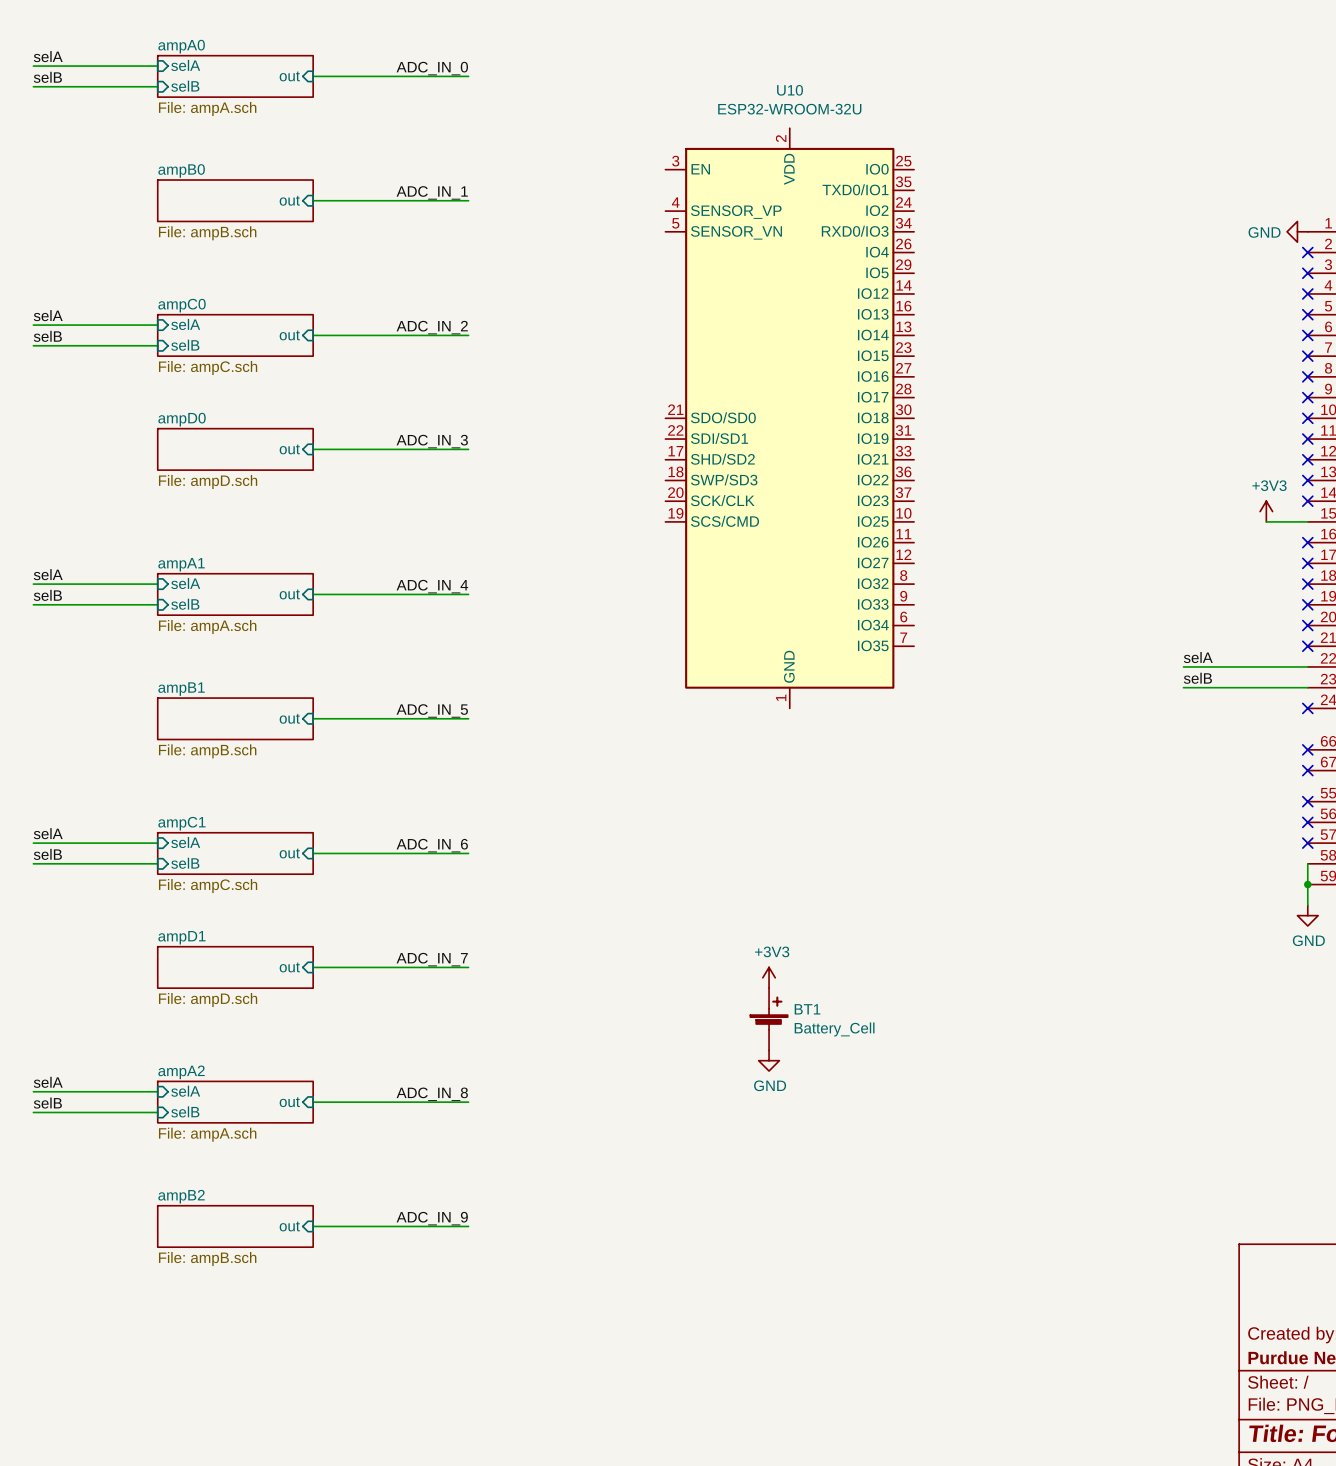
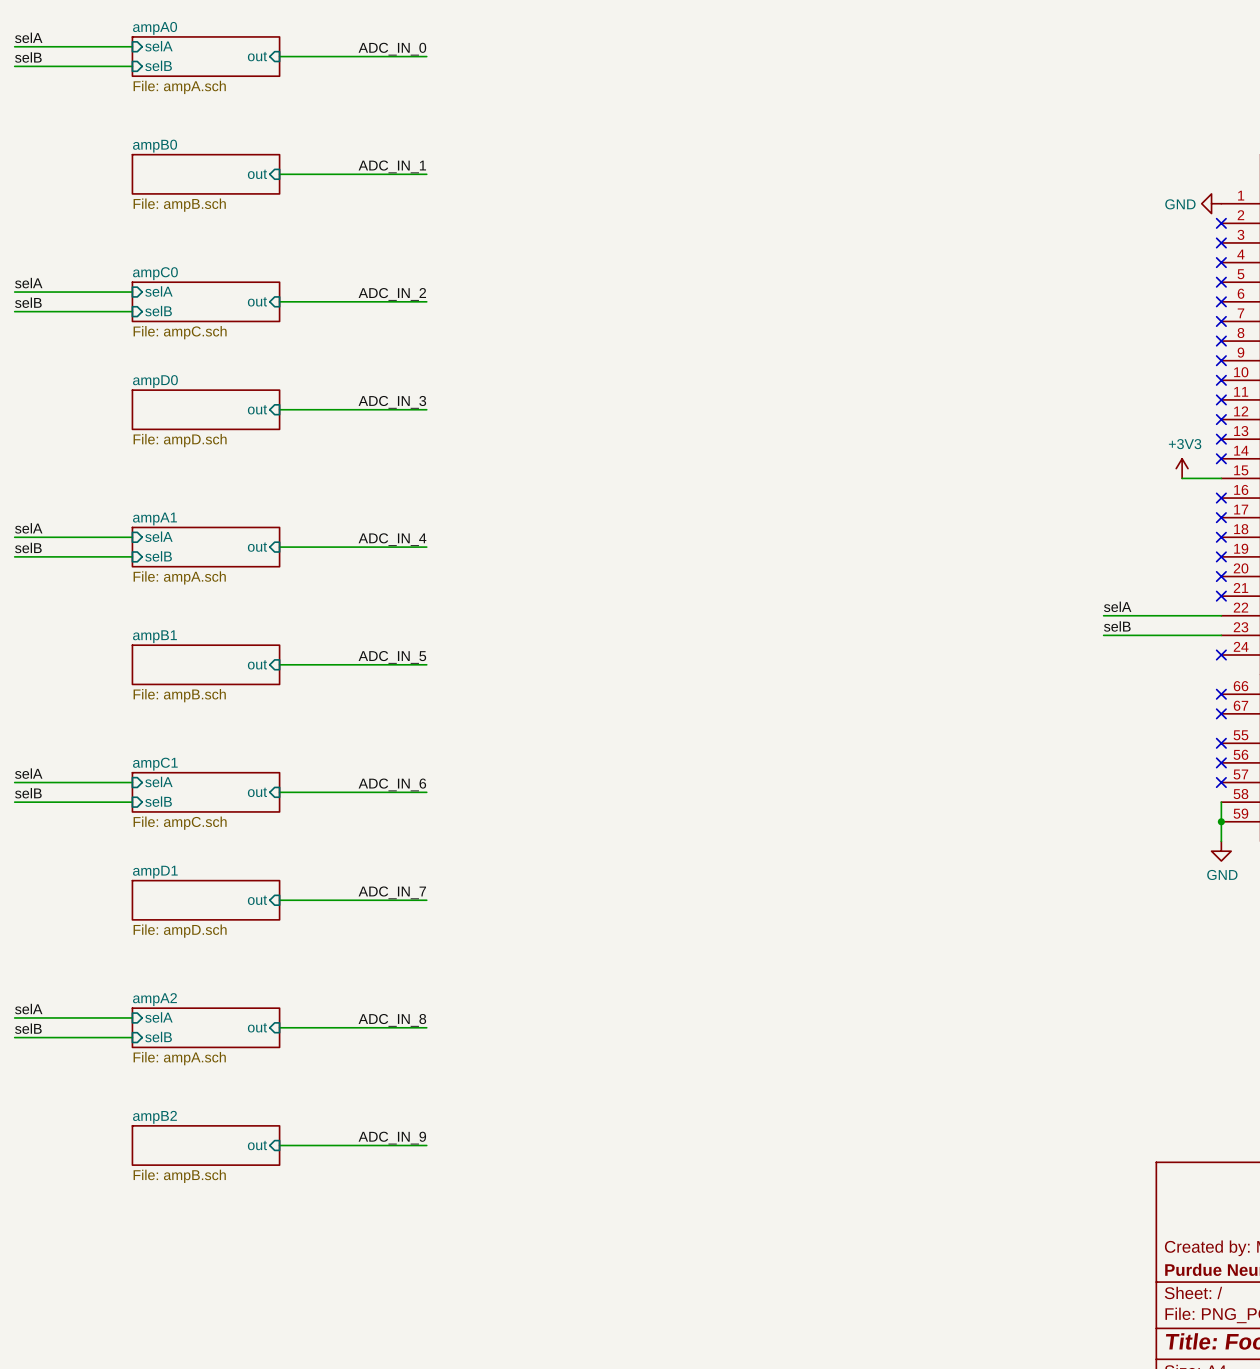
U10: ESP32-WROOM-32U (789, 418) -> none
power symbol: +3V3 (769, 977) -> none
BT1: Battery_Cell (769, 1019) -> none
power symbol: GND (769, 1060) -> none

